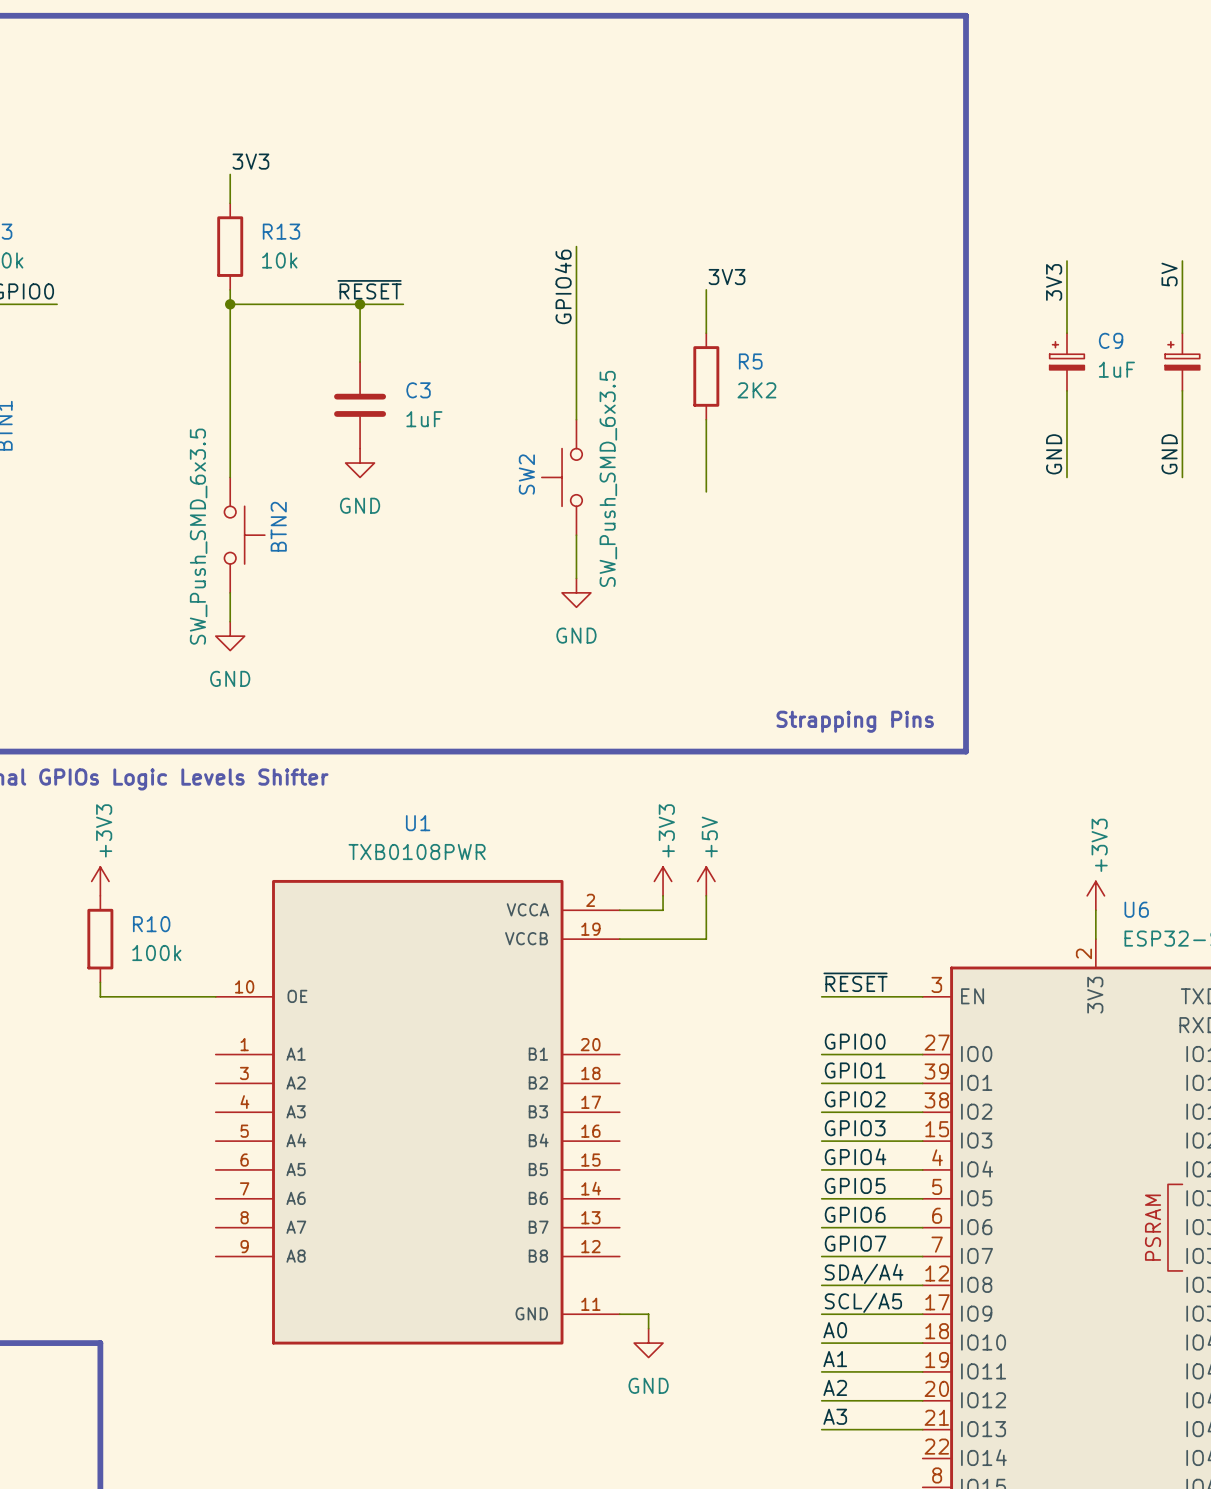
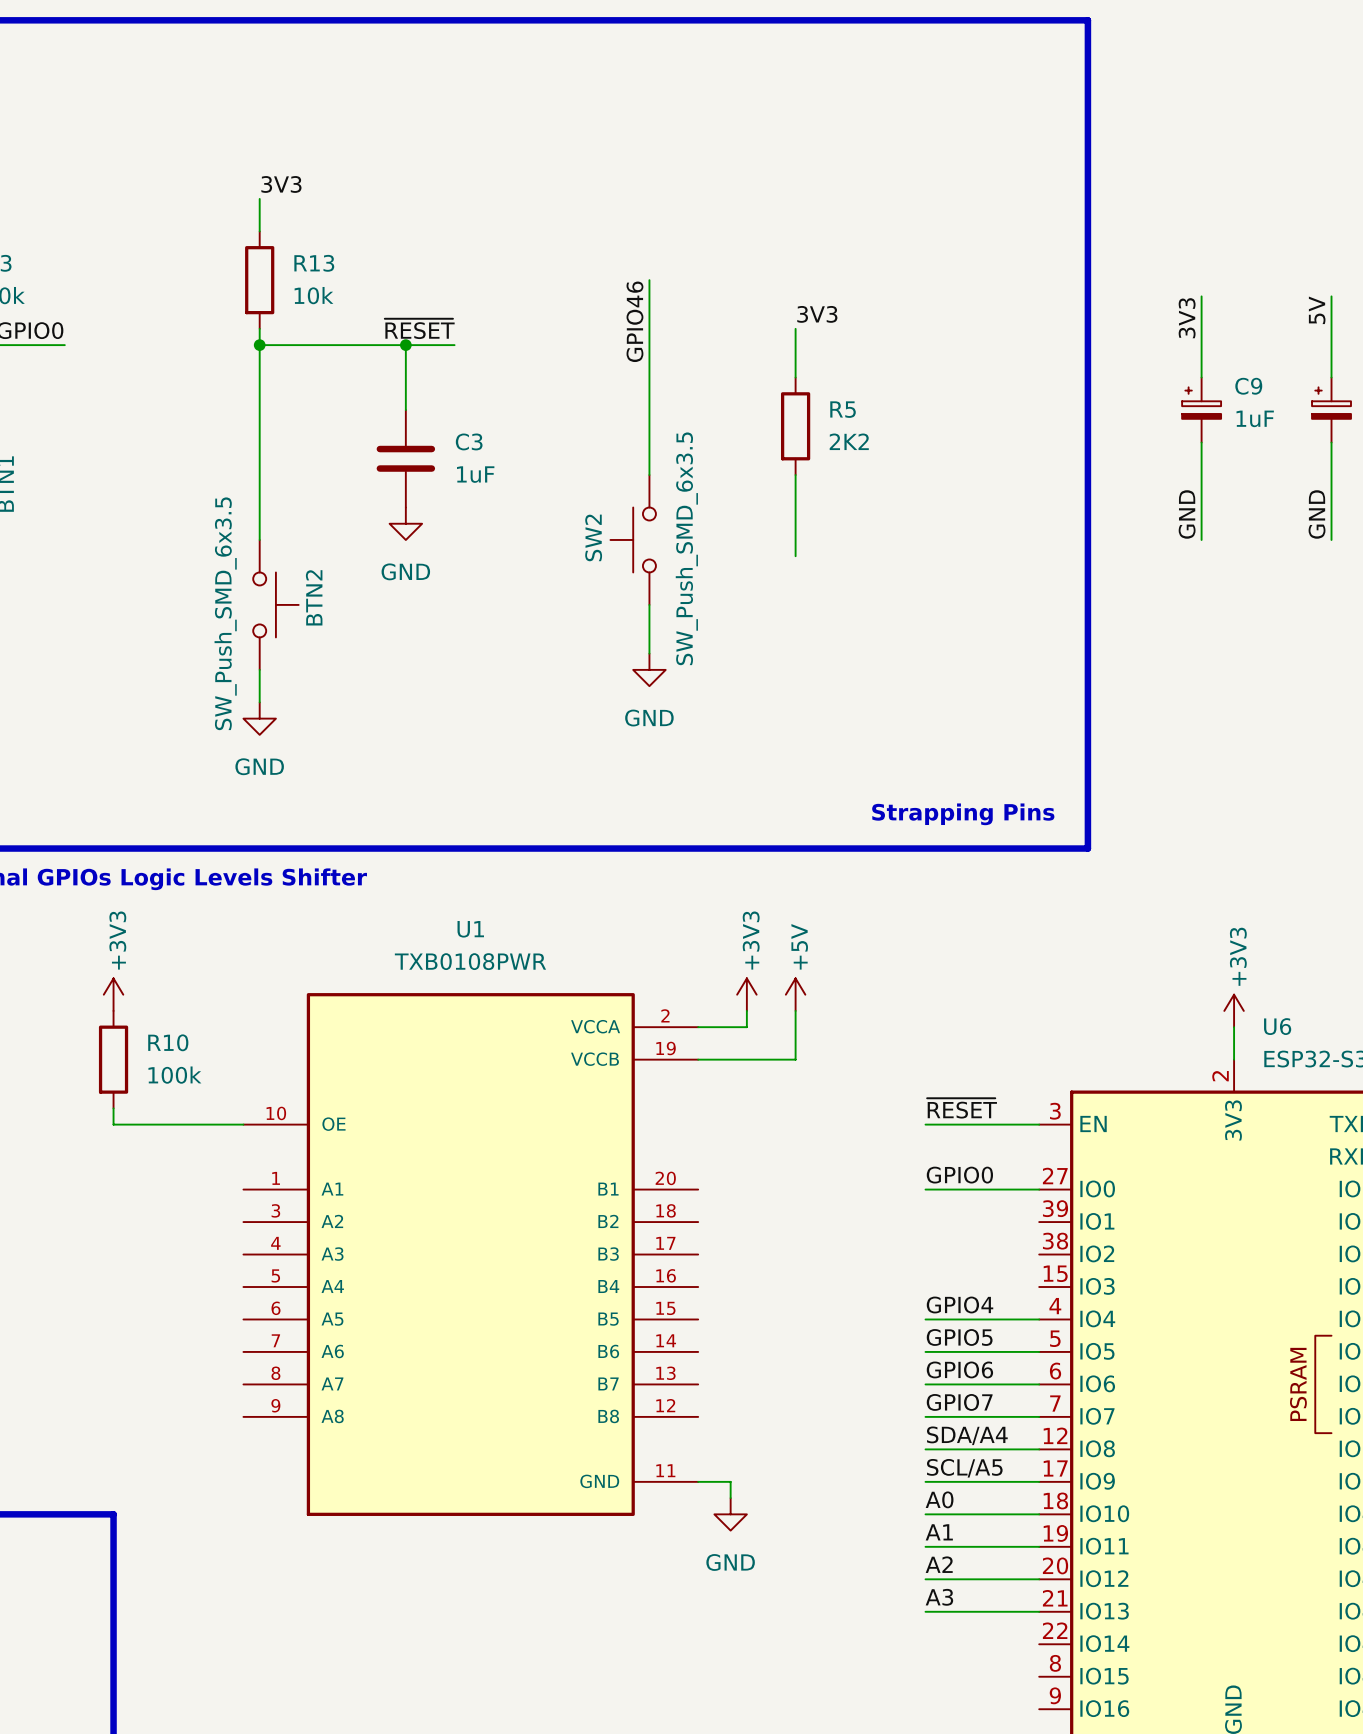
label: GPIO1 (855, 1070) -> none
wire: (821, 1083) (922, 1083) -> none
label: GPIO2 (855, 1099) -> none
wire: (821, 1112) (922, 1112) -> none
label: GPIO3 (855, 1128) -> none
wire: (821, 1141) (922, 1141) -> none

